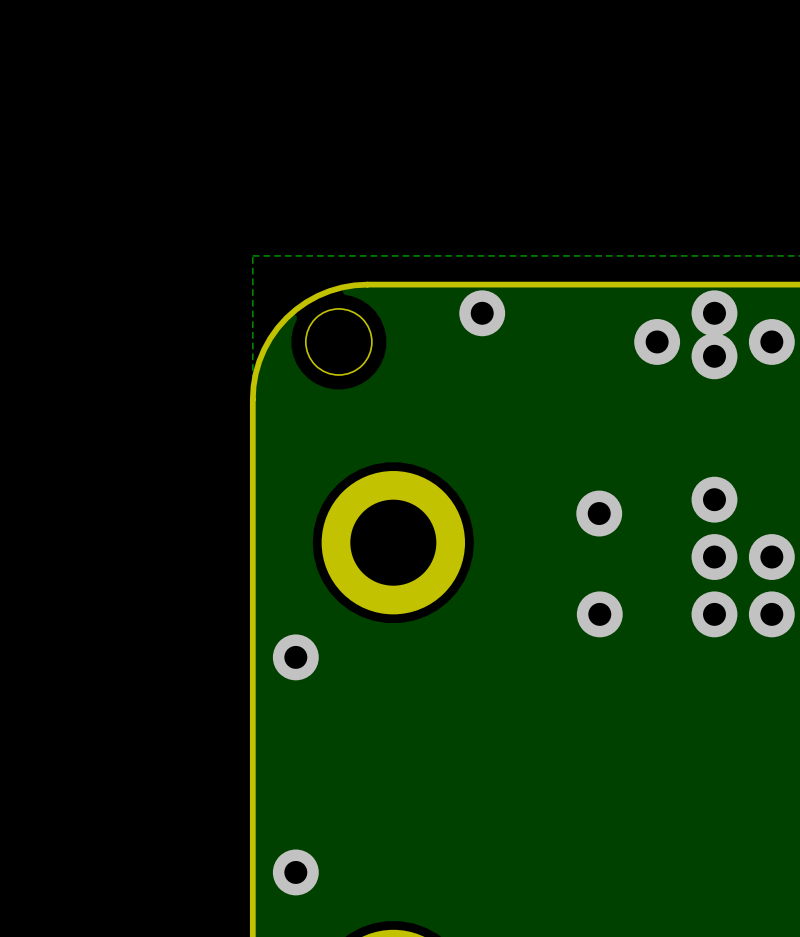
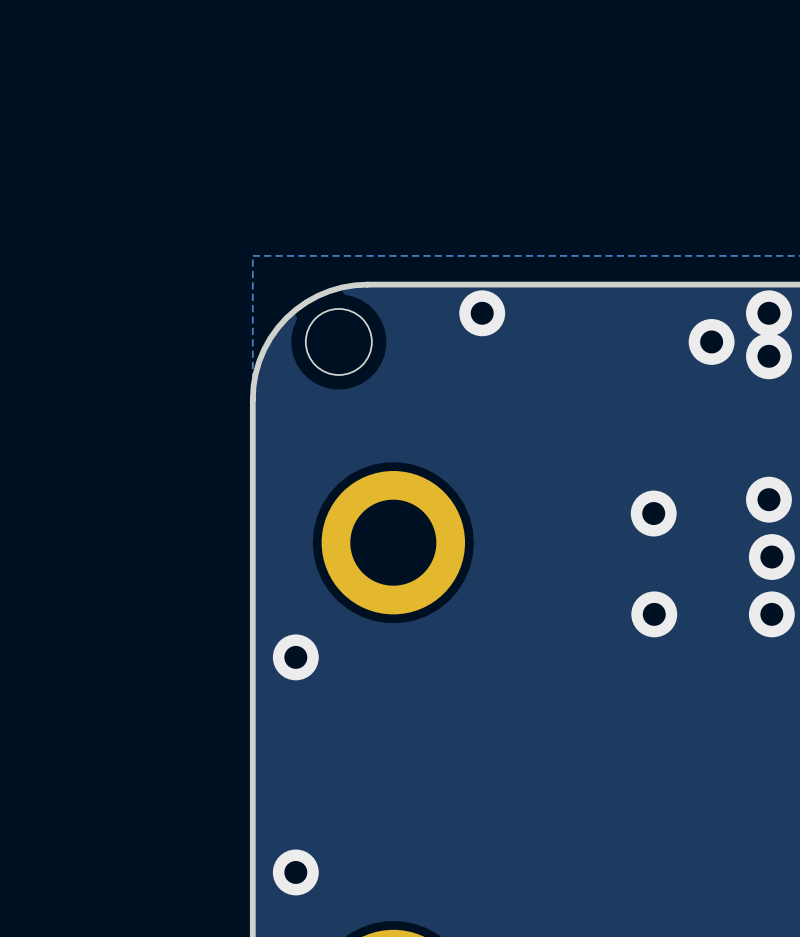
via: (714, 313) -> none
via: none -> (768, 313)
via: (657, 341) -> none
via: none -> (711, 341)
via: (771, 341) -> none
via: (714, 356) -> none
via: none -> (768, 356)
via: (714, 499) -> none
via: none -> (768, 499)
via: (599, 513) -> none
via: none -> (653, 513)
via: (714, 557) -> none
via: (599, 614) -> none
via: none -> (654, 614)
via: (714, 614) -> none

